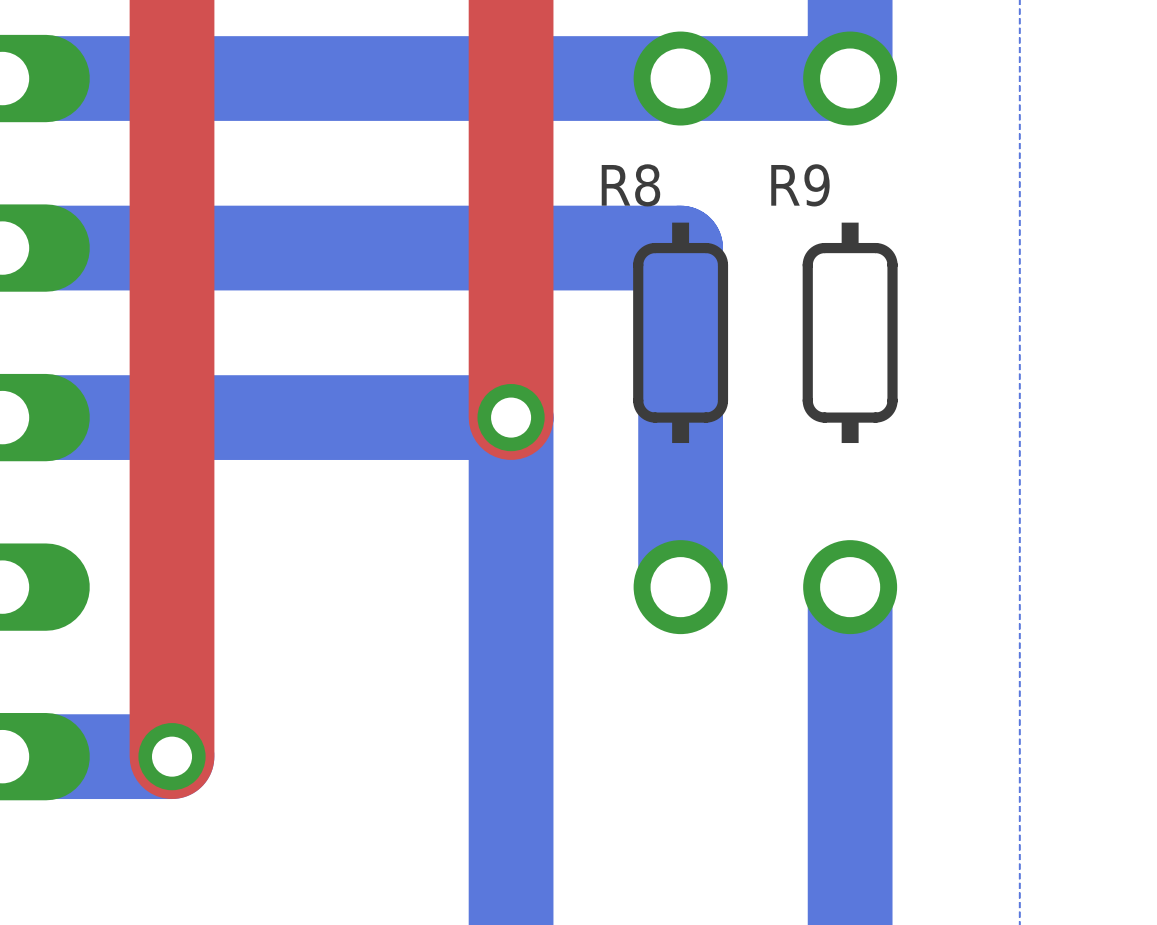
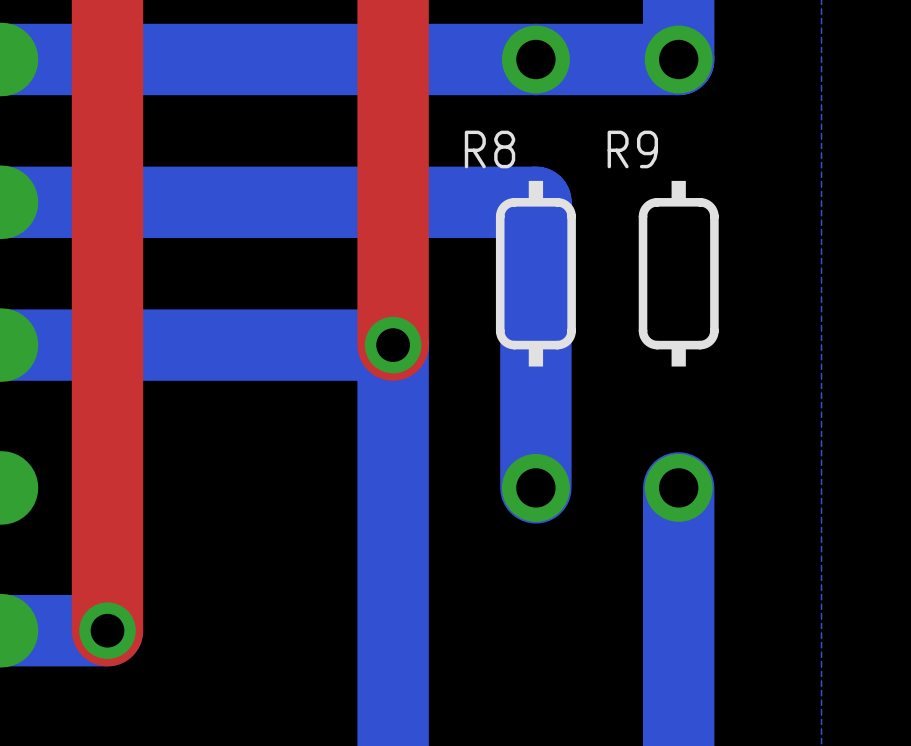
R8 footprint: [633, 31, 729, 635] -> [495, 25, 576, 522]
R9 footprint: [802, 31, 898, 635] -> [638, 25, 719, 522]

